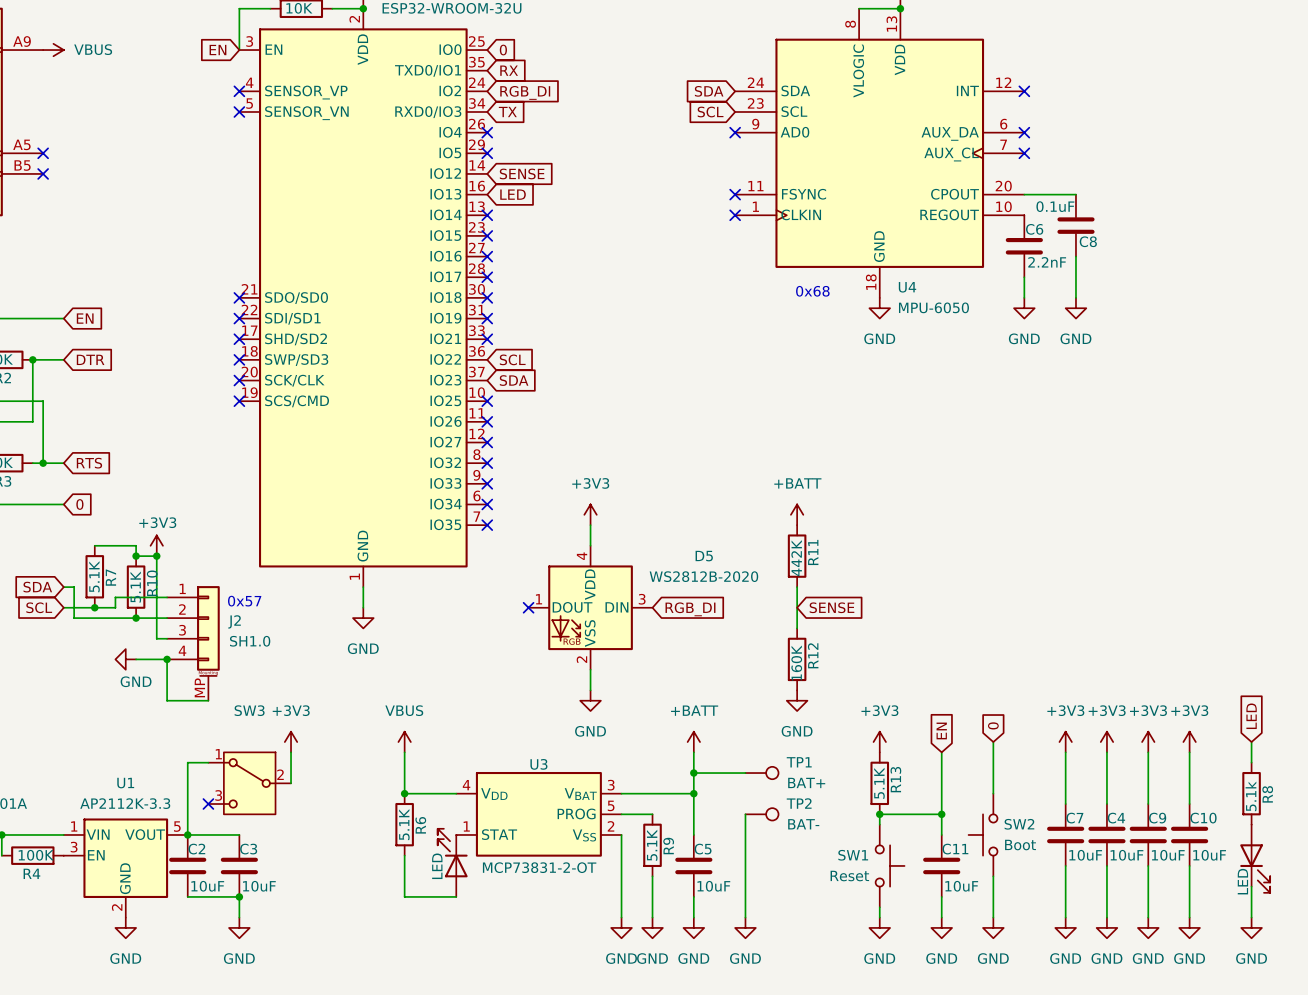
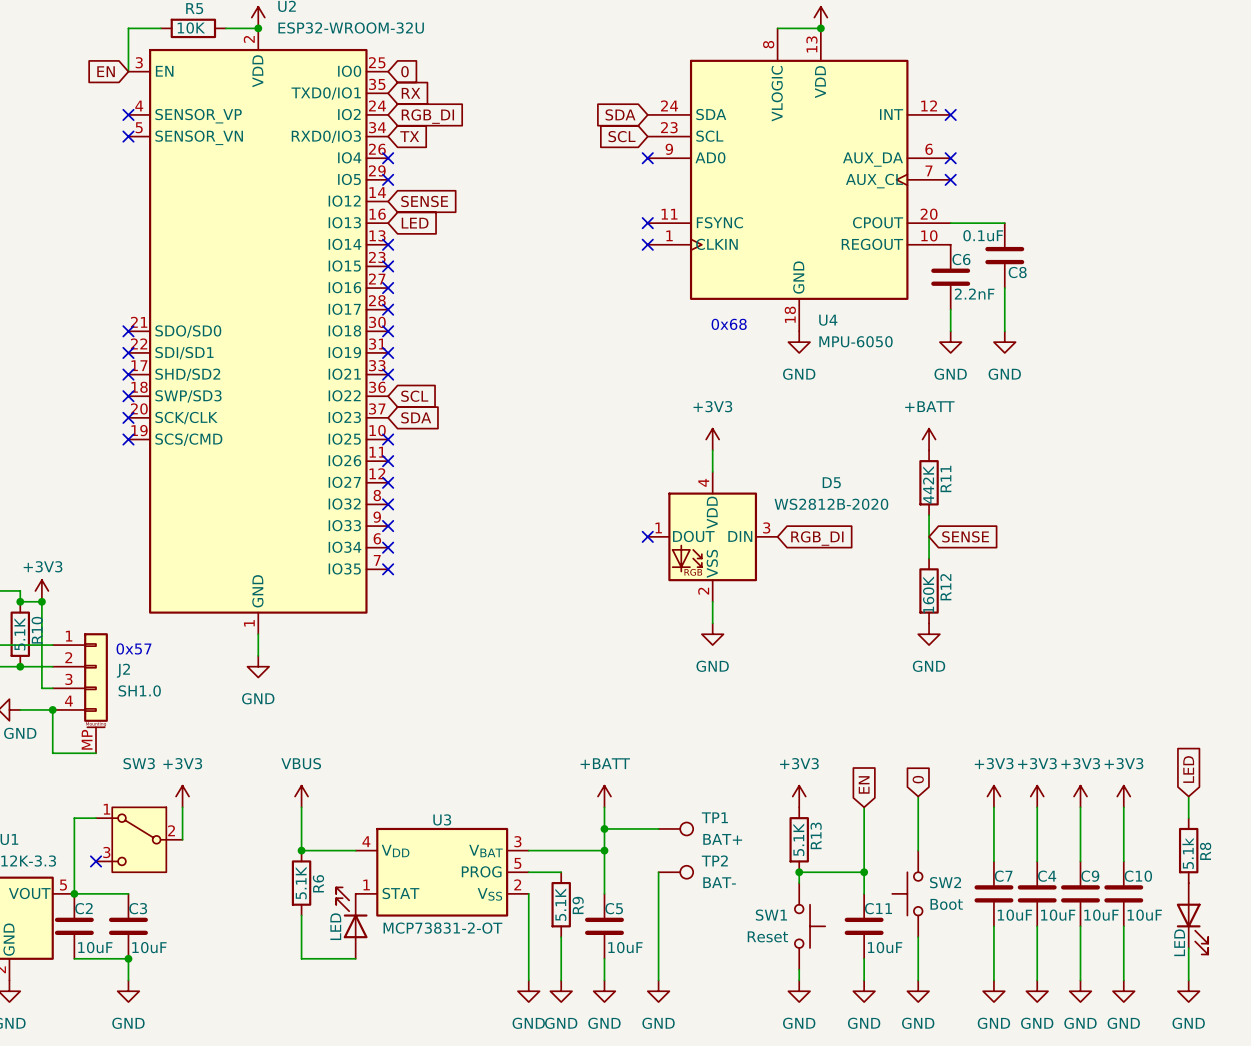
power symbol: none -> +3V3 (712, 439)
power symbol: none -> +BATT (929, 439)
wire: none -> (712, 450) (712, 471)
wire: none -> (929, 515) (929, 558)
no-connect mark: none -> (647, 536)
global label: none -> SENSE (965, 536)
global label: none -> RGB_DI (817, 538)
power symbol: +3V3 (590, 514) -> none
power symbol: +BATT (797, 514) -> none
wire: (590, 525) (590, 545) -> none
wire: none -> (712, 601) (712, 623)
R11 position: (797, 556) -> (929, 482)
wire: (797, 587) (797, 628) -> none
power symbol: none -> GND (929, 634)
no-connect mark: (528, 607) -> none
D5 position: (590, 607) -> (712, 536)
global label: SENSE (831, 607) -> none
global label: RGB_DI (690, 609) -> none
R12 position: (797, 659) -> (929, 590)
wire: (590, 669) (590, 690) -> none
power symbol: GND (590, 700) -> none
power symbol position: GND (797, 700) -> GND (712, 634)

